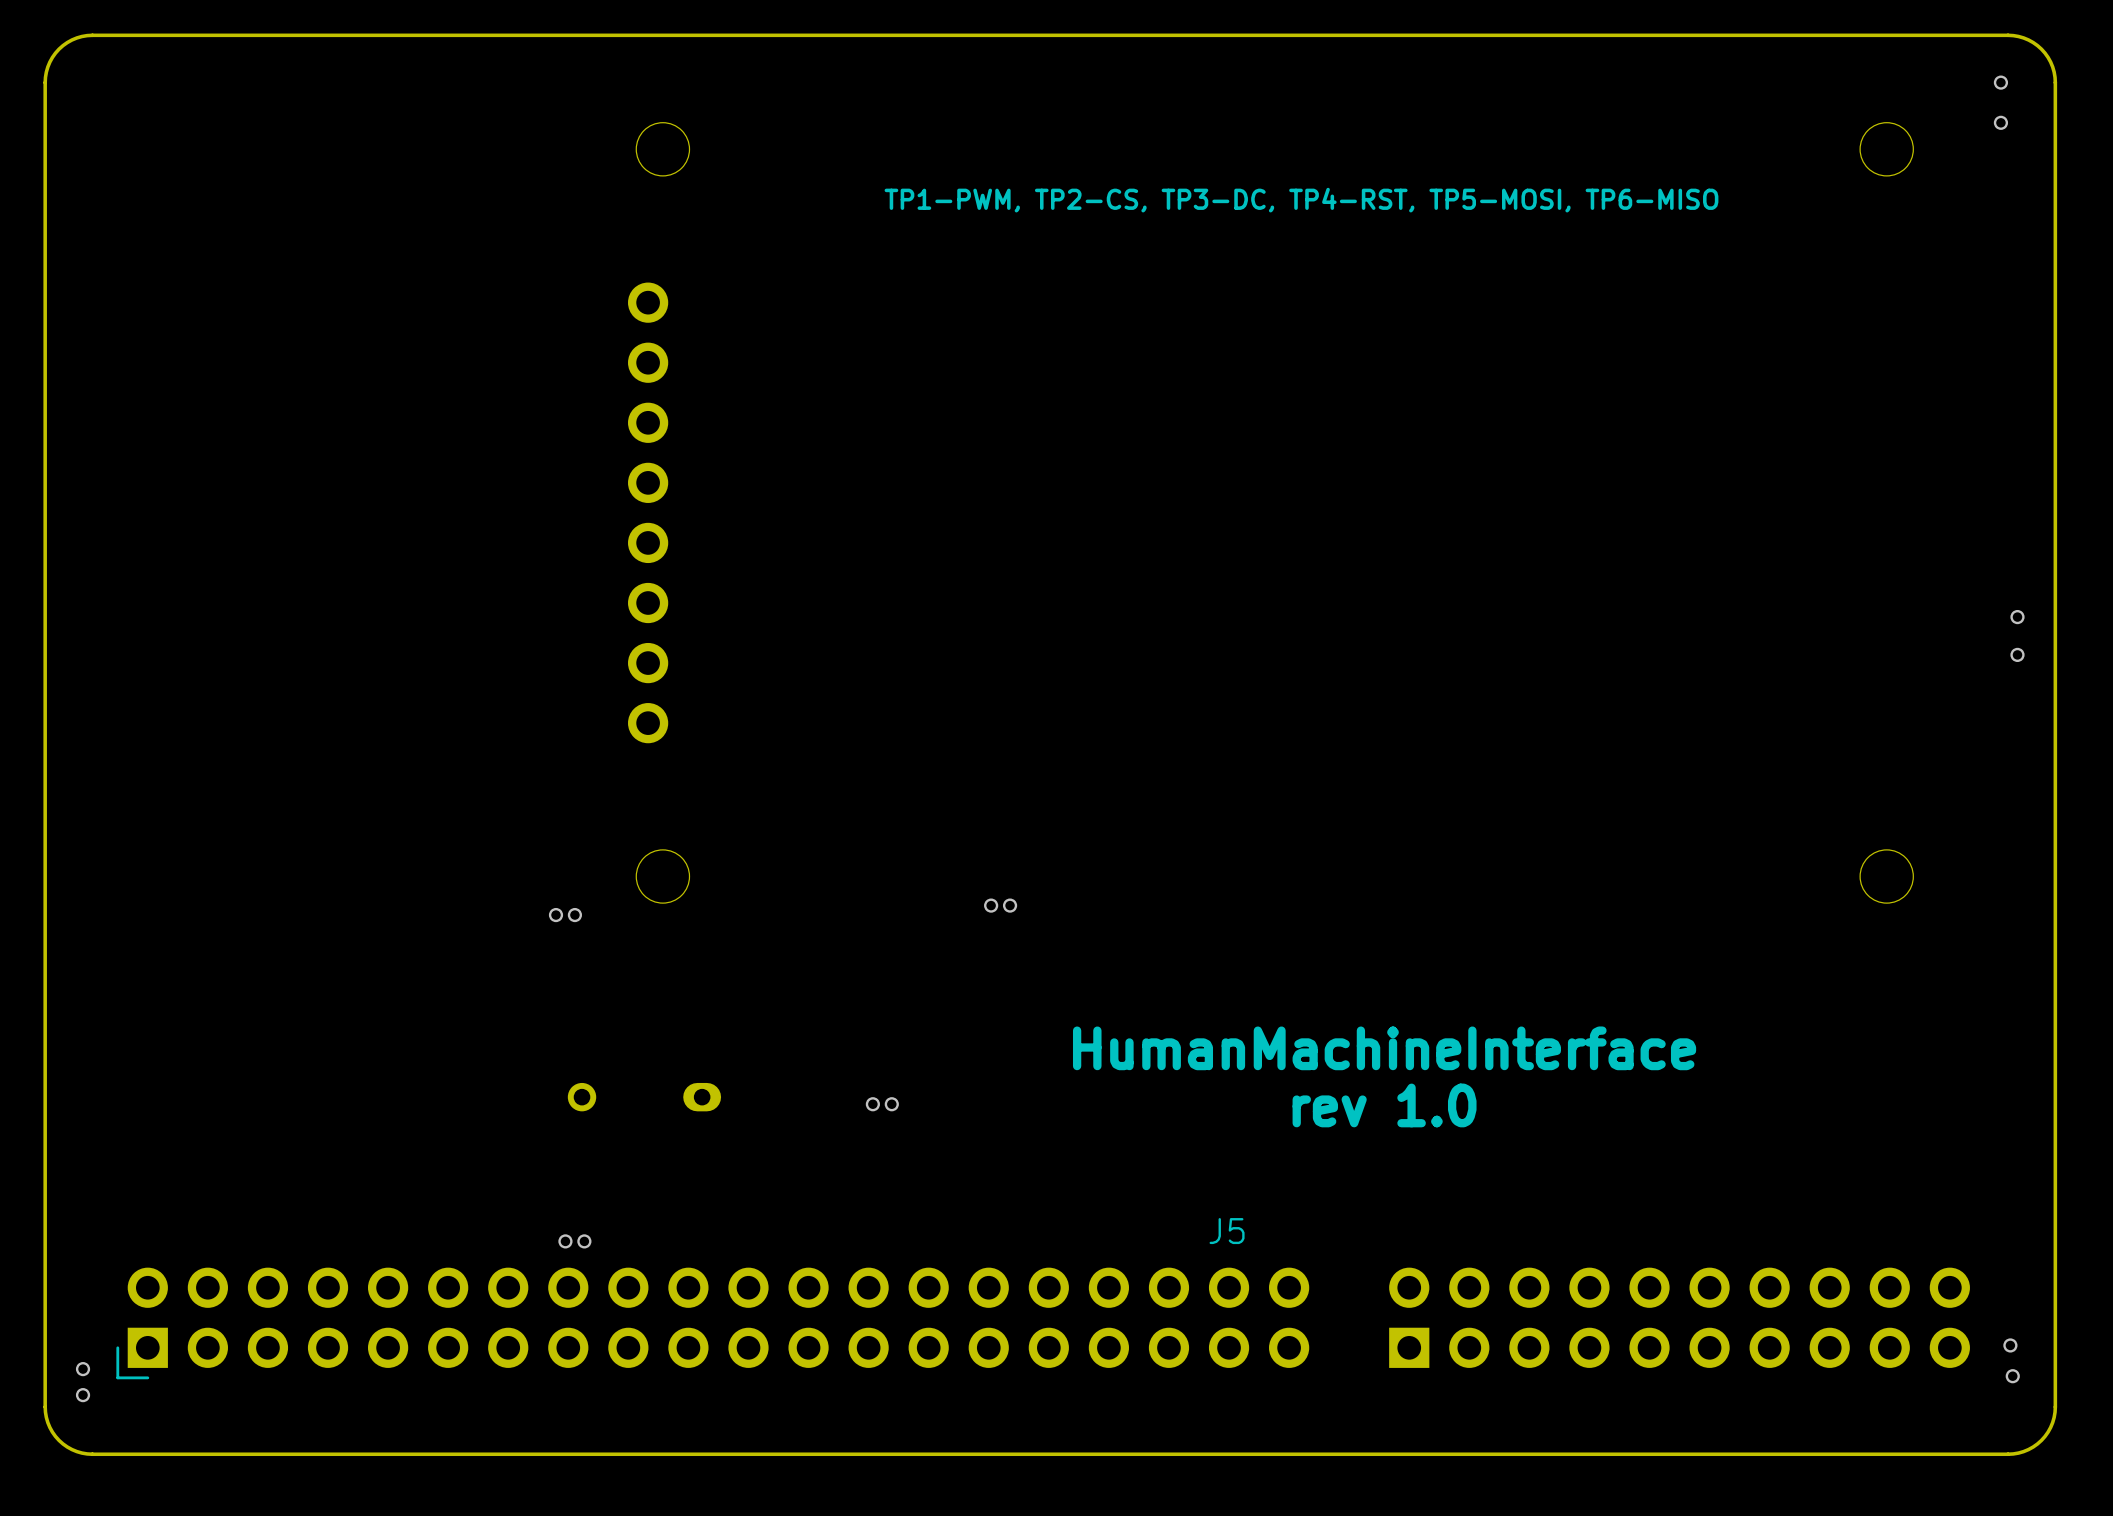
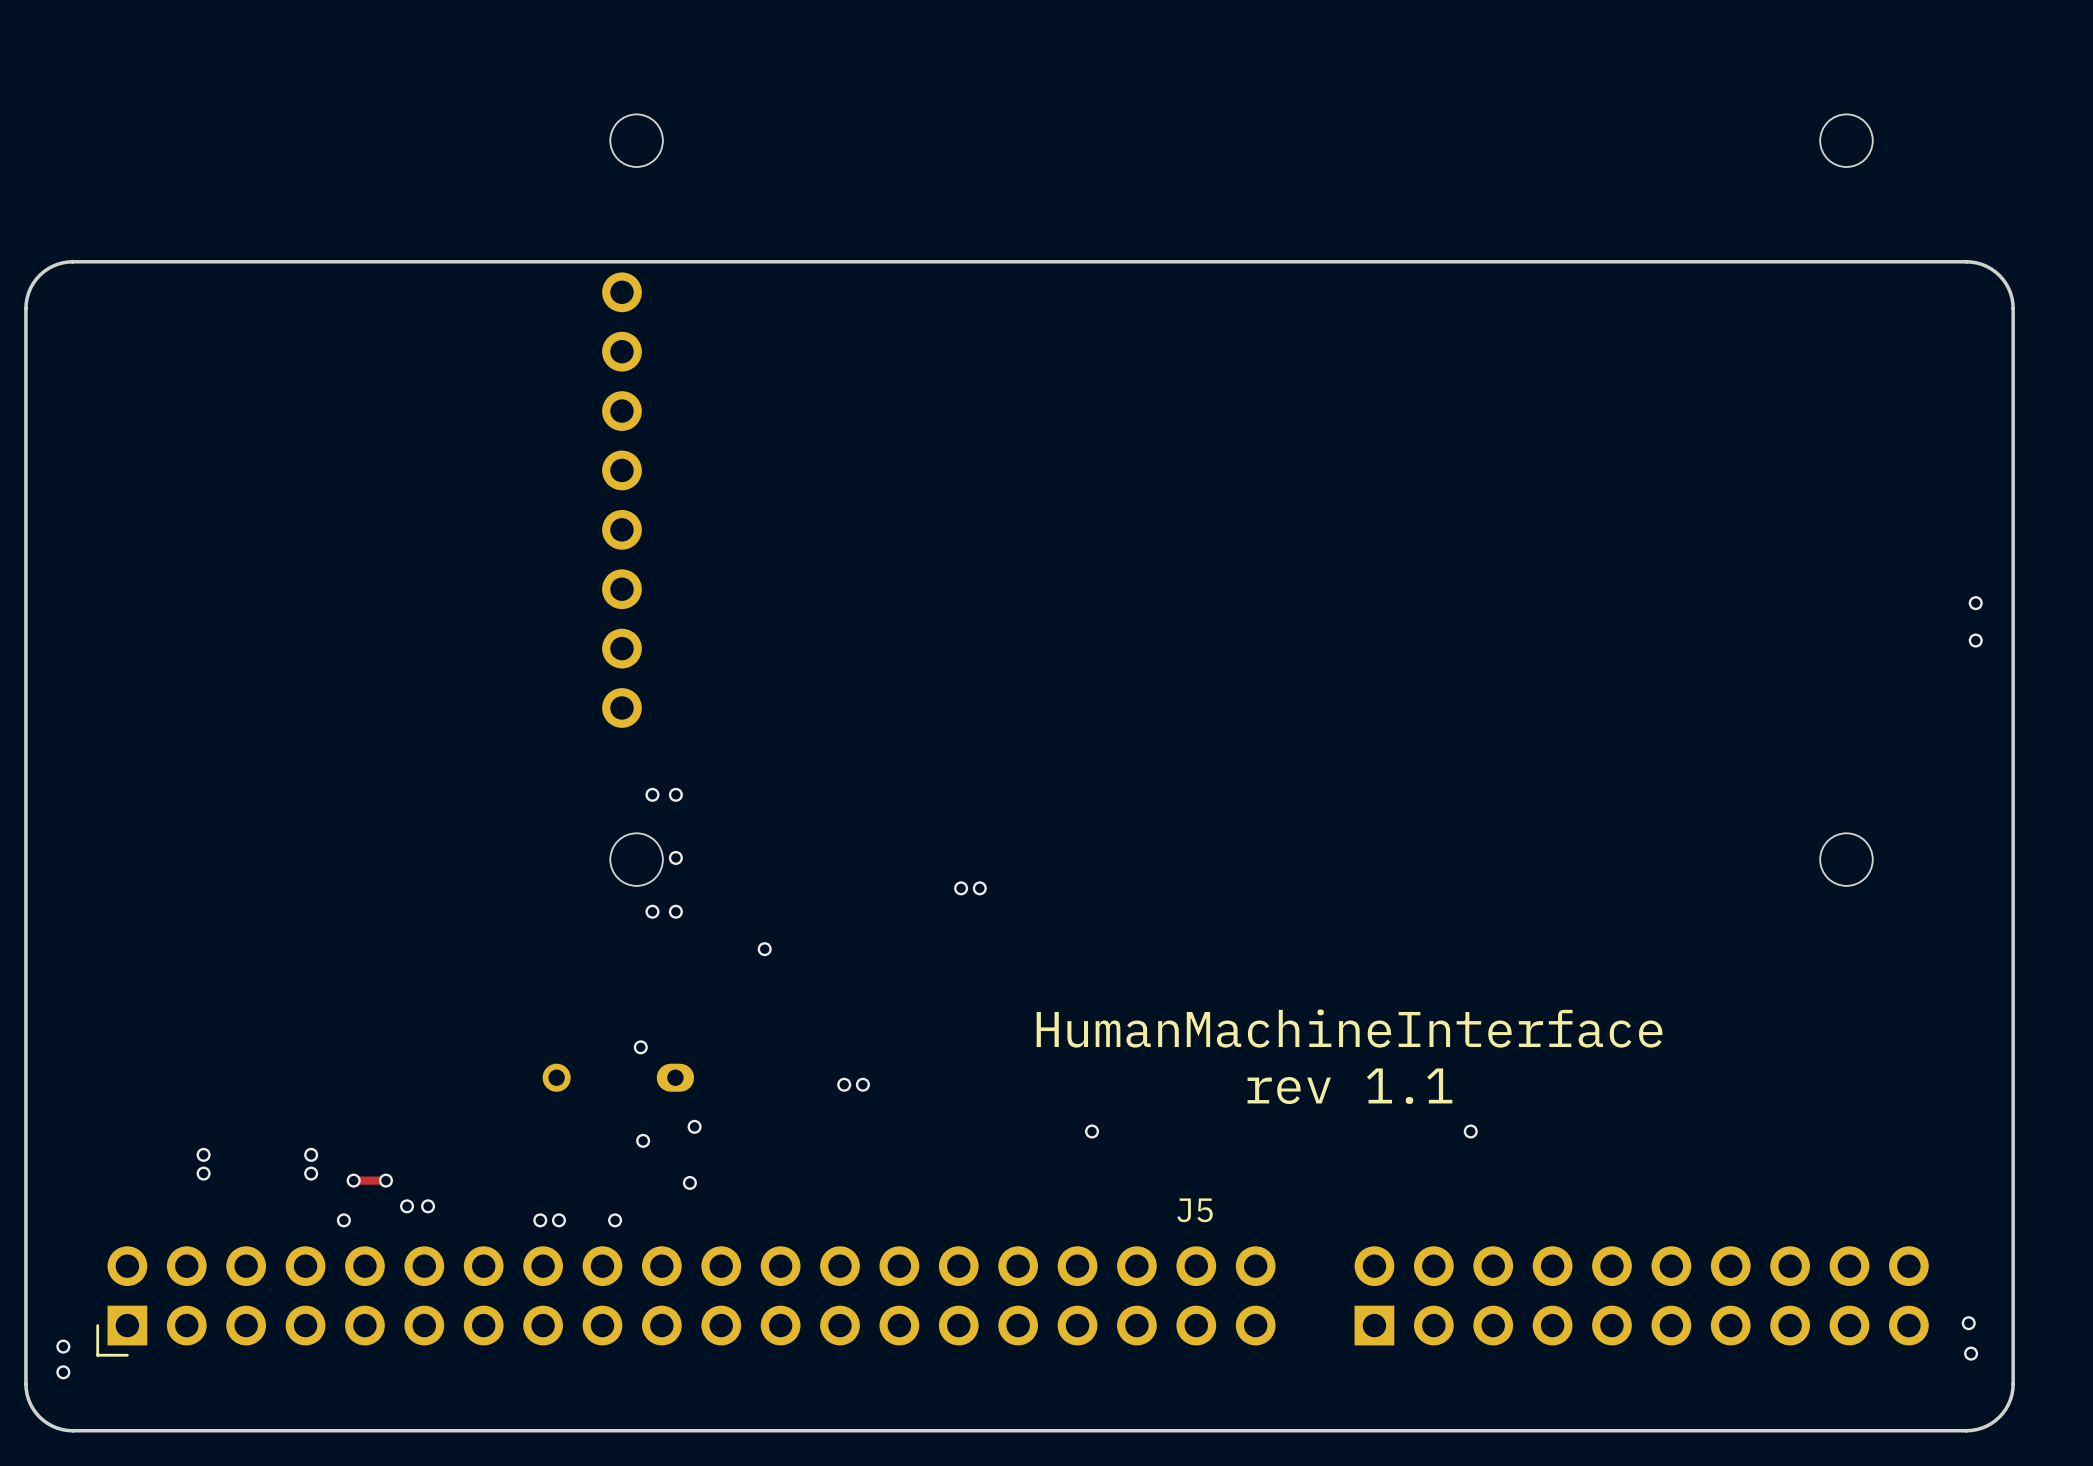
via: (2000, 82) -> none
via: (2000, 122) -> none
text: TP1-PWM, TP2-CS, TP3-DC, TP4-RST, TP5-MOSI, TP6-MISO (1301, 200) -> none
board edge: (45, 319) (45, 77) (52, 57) (62, 45) (76, 37) (92, 35) (2013, 35) (2028, 39) (2041, 49) (2050, 62) (2055, 77) (2055, 319) -> (25, 308) (28, 293) (39, 275) (57, 264) (72, 261) (1966, 261) (1986, 266) (1999, 275) (2010, 293) (2013, 308)
via: none -> (652, 794)
via: none -> (675, 794)
via: none -> (675, 857)
via: (556, 915) -> none
via: (574, 915) -> none
via: none -> (652, 911)
via: none -> (675, 911)
via: none -> (764, 949)
via: none -> (640, 1047)
text: rev 1.0 (1384, 1105) -> rev 1.1 (1349, 1086)
via: none -> (694, 1126)
via: none -> (1092, 1131)
via: none -> (1470, 1131)
via: none -> (643, 1140)
via: none -> (203, 1154)
via: none -> (311, 1154)
via: none -> (203, 1173)
via: none -> (311, 1173)
track: none -> (353, 1180) (385, 1180)
via: none -> (353, 1180)
via: none -> (385, 1180)
via: none -> (689, 1182)
via: none -> (407, 1206)
via: none -> (428, 1206)
via: none -> (343, 1220)
via: none -> (615, 1220)

